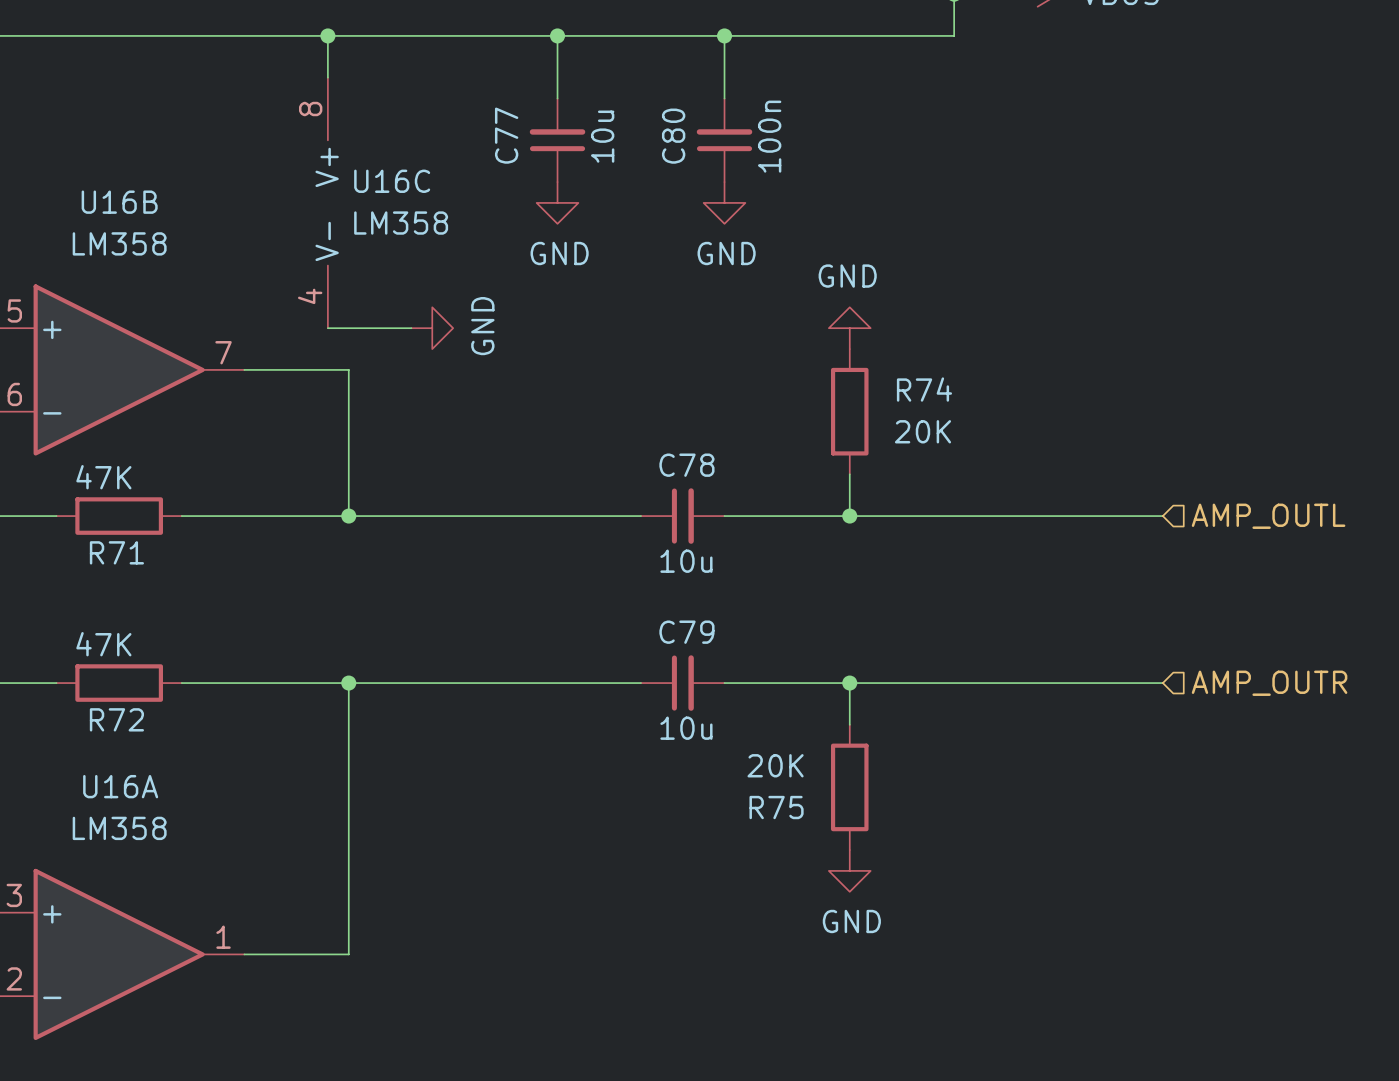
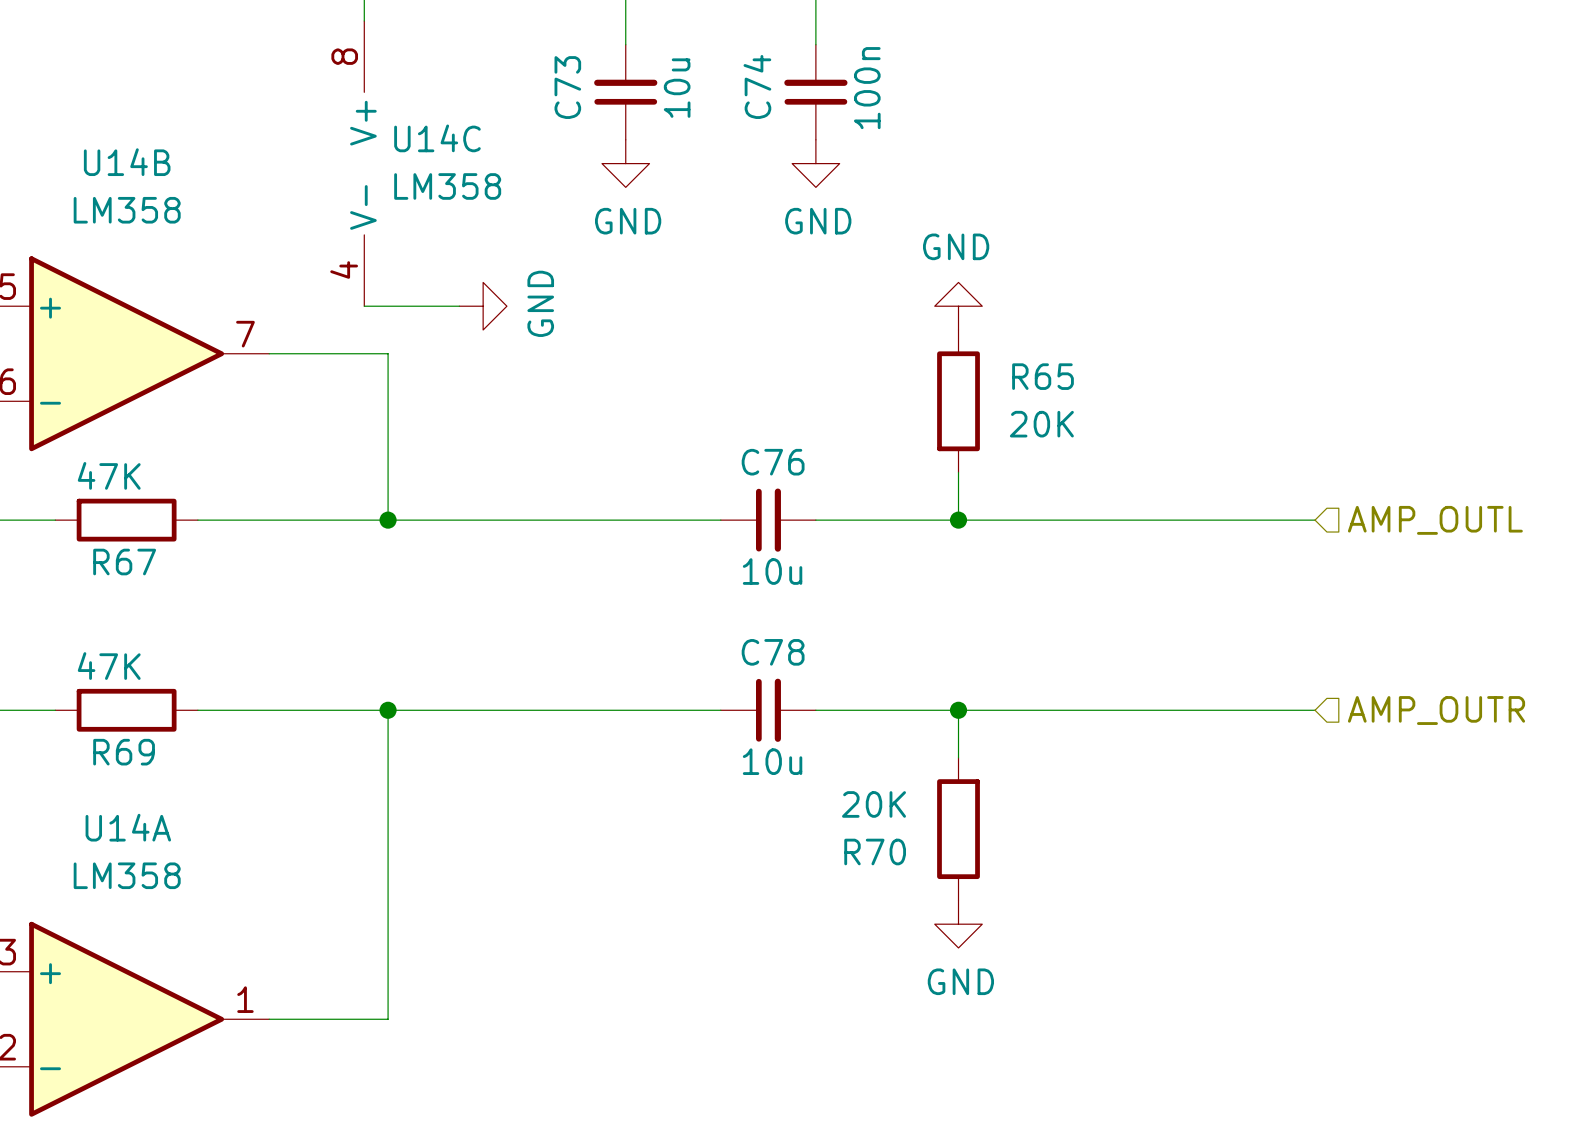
C77 name: C77 (506, 135) -> C73 (567, 87)
C80 name: C80 (673, 136) -> C74 (757, 86)
U16C name: U16C (392, 181) -> U14C (437, 138)
U16B name: U16B (119, 202) -> U14B (127, 162)
R74 name: R74 (924, 389) -> R65 (1043, 376)
C78 name: C78 (686, 465) -> C76 (773, 462)
R71 name: R71 (116, 552) -> R67 (124, 562)
C79 name: C79 (686, 632) -> C78 (773, 652)
R72 name: R72 (116, 719) -> R69 (124, 752)
U16A name: U16A (120, 786) -> U14A (128, 827)
R75 name: R75 (776, 807) -> R70 (875, 852)

